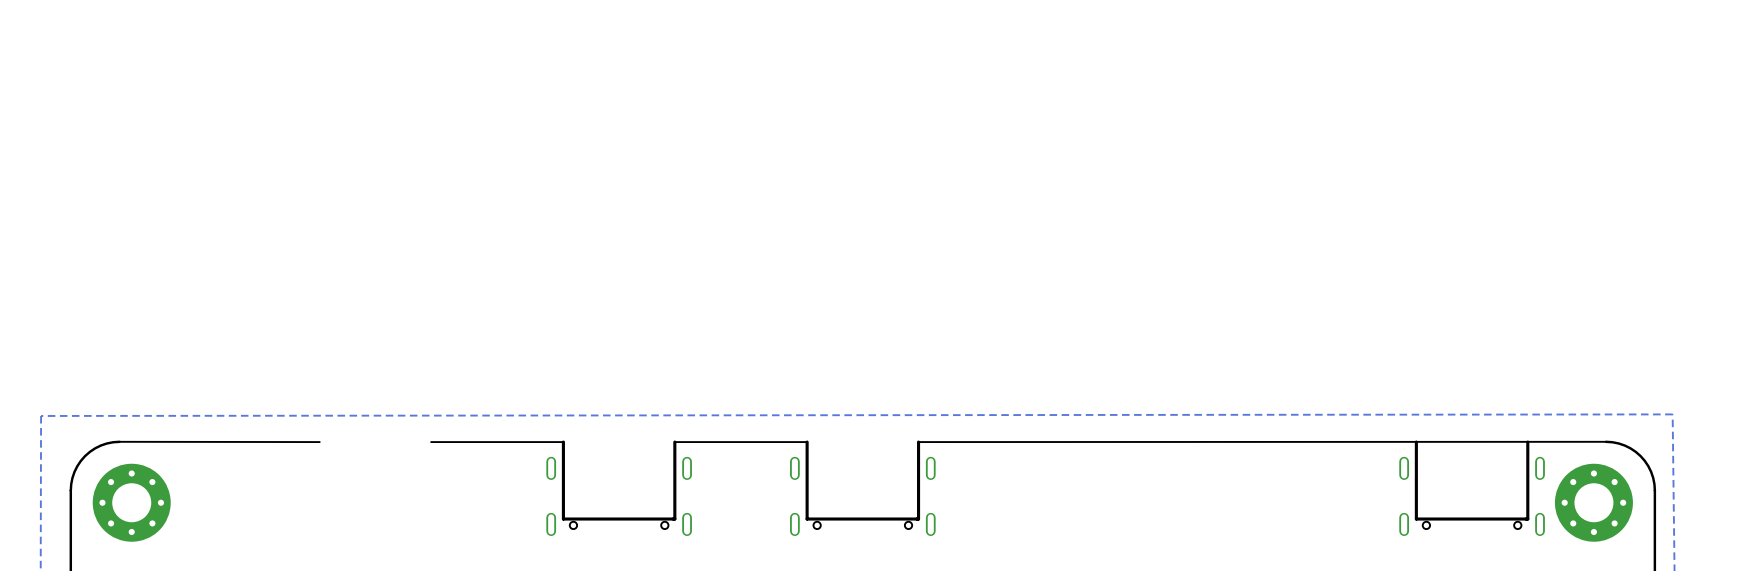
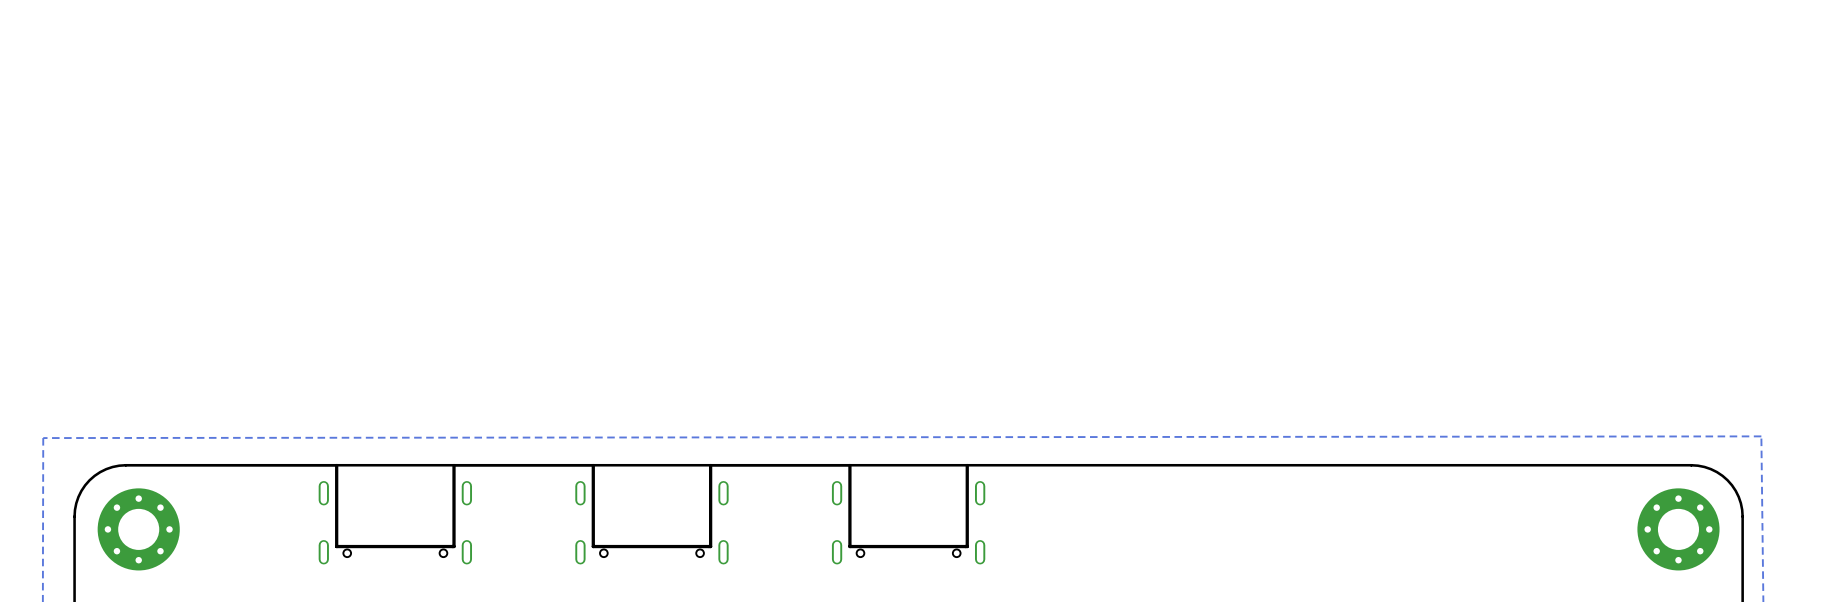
board edge: (1606, 441) (918, 442) -> (1691, 465) (125, 465)
part: none -> (395, 514)
part: (1472, 488) -> none

